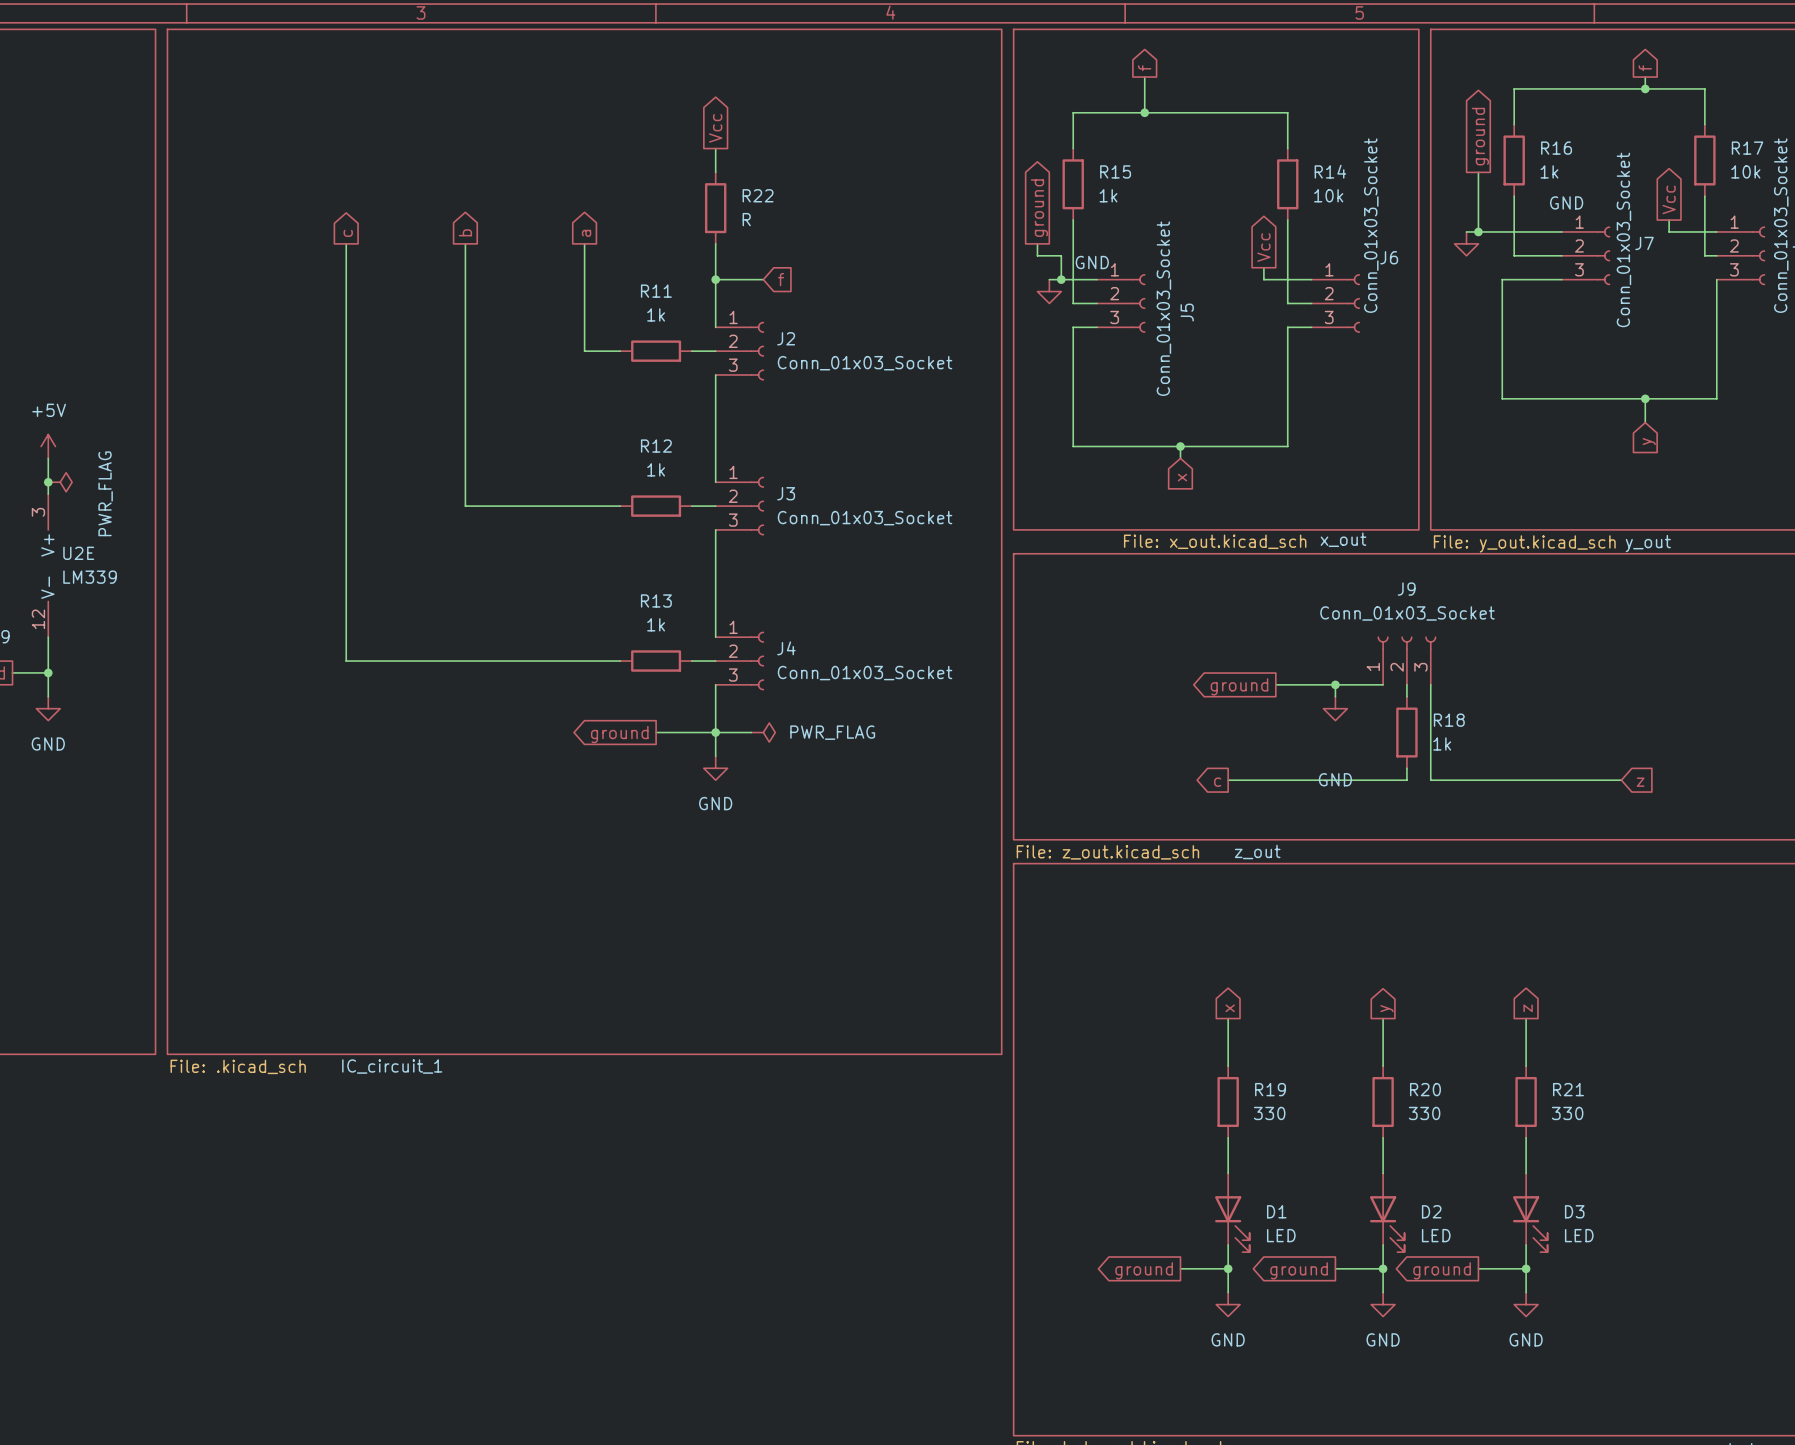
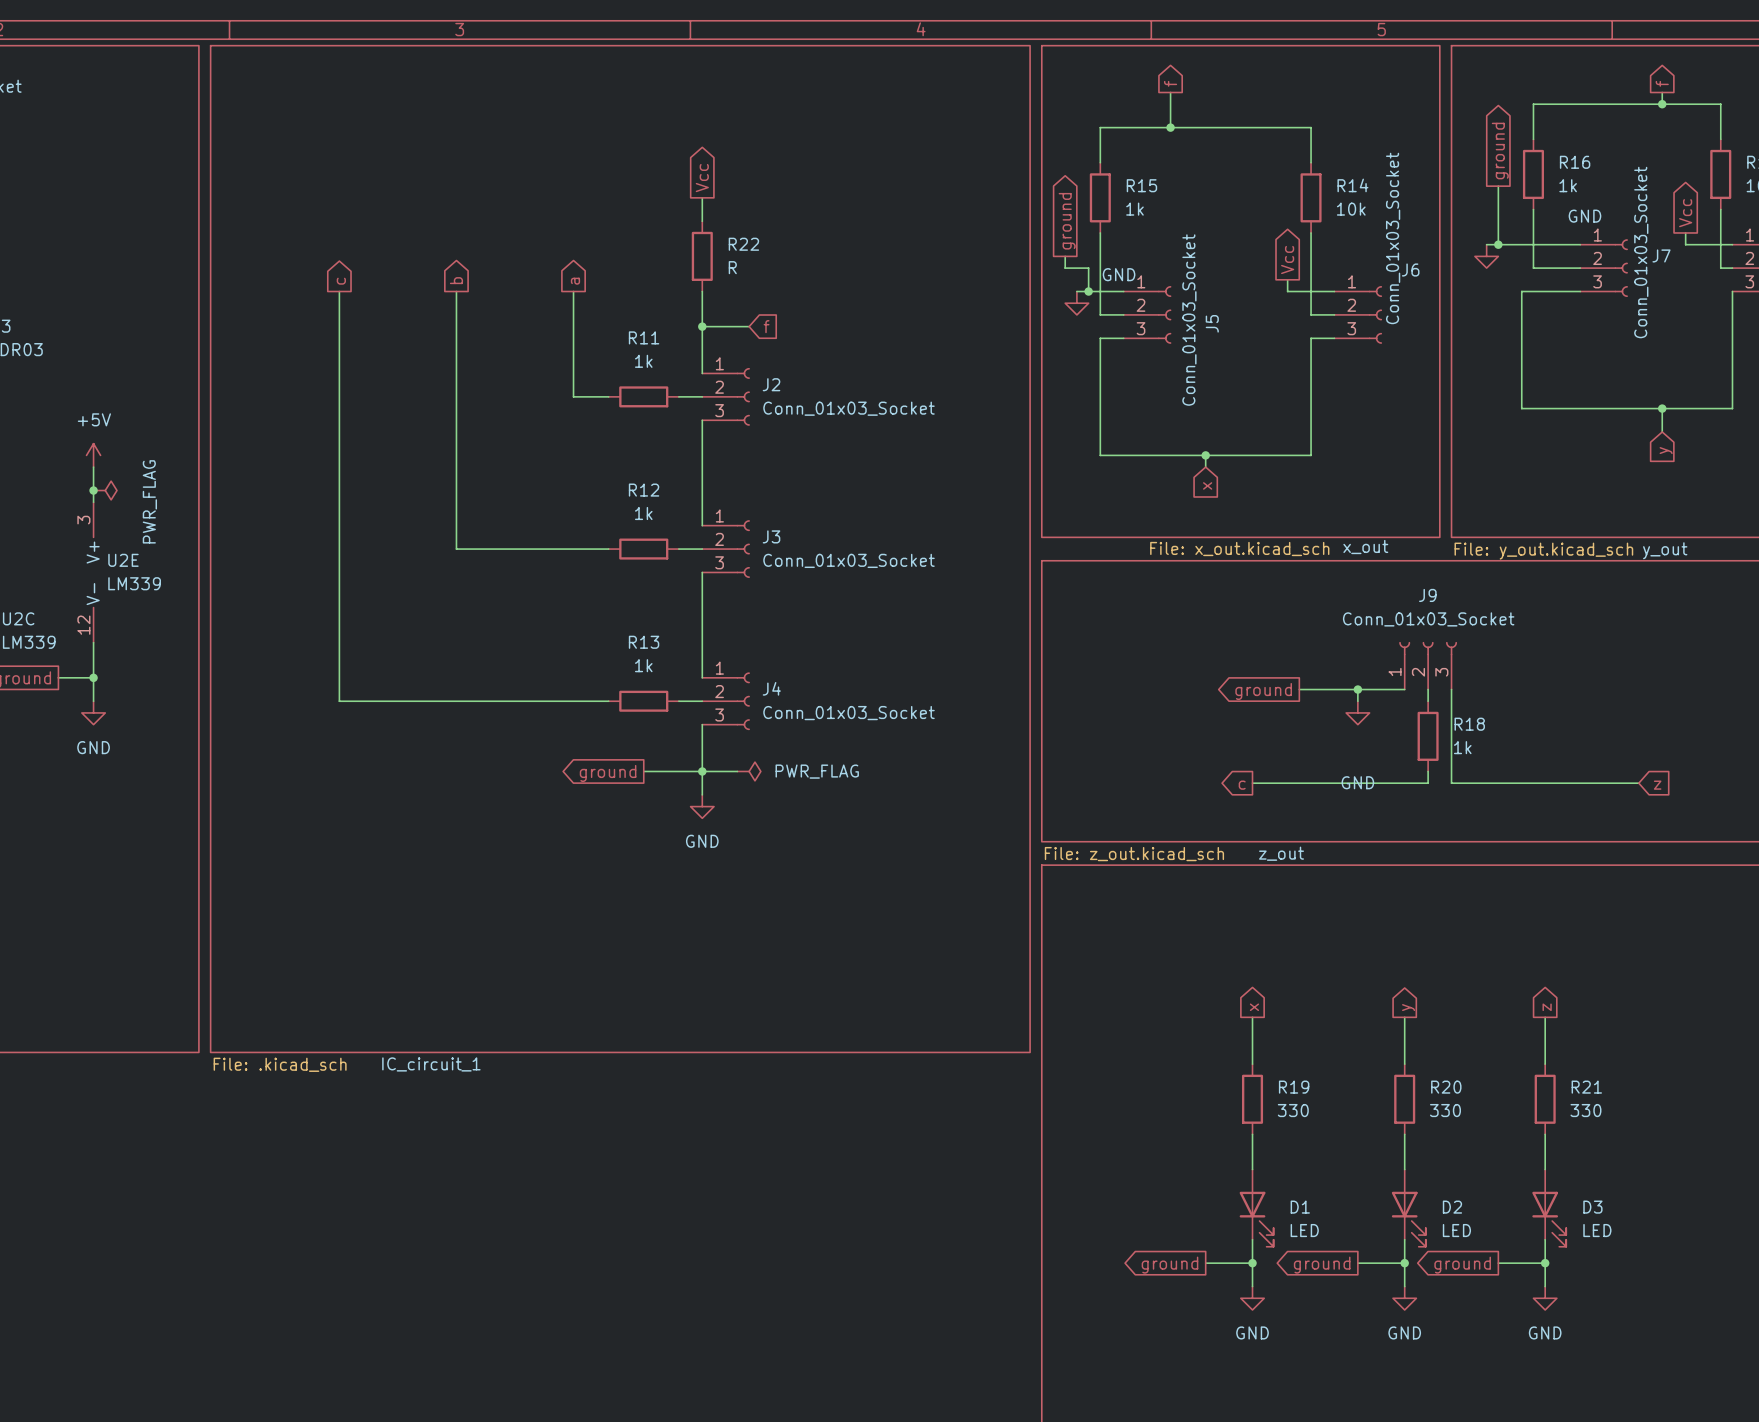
global label position: Vcc (715, 128) -> Vcc (702, 178)
wire: (715, 148) (715, 172) -> (702, 197) (702, 221)
R22 position: (715, 208) -> (702, 256)
global label position: b (465, 232) -> b (456, 280)
global label position: c (348, 233) -> c (341, 281)
global label position: a (586, 233) -> a (575, 281)
wire: (346, 243) (346, 661) (620, 661) -> (339, 291) (339, 701) (608, 701)
wire: (465, 243) (465, 506) (620, 506) -> (456, 291) (456, 549) (608, 549)
wire: (584, 243) (584, 351) (620, 351) -> (573, 291) (573, 396) (608, 396)
wire: (715, 243) (715, 327) -> (702, 291) (702, 373)
wire: (715, 279) (763, 279) -> (702, 326) (749, 326)
junction: (715, 279) -> none
global label position: f (781, 279) -> f (766, 326)
junction: none -> (702, 326)
R11 position: (656, 351) -> (643, 396)
wire: (691, 351) (715, 351) -> (678, 396) (702, 396)
J2 position: (739, 351) -> (726, 396)
wire: (715, 374) (715, 482) -> (702, 420) (702, 525)
R12 position: (656, 506) -> (643, 549)
wire: (691, 506) (715, 506) -> (678, 549) (702, 549)
J3 position: (739, 506) -> (726, 549)
wire: (715, 529) (715, 637) -> (702, 572) (702, 677)
R13 position: (656, 661) -> (643, 701)
wire: (691, 661) (715, 661) -> (678, 701) (702, 701)
J4 position: (739, 661) -> (726, 701)
wire: (715, 684) (715, 756) -> (702, 724) (702, 794)
wire: (656, 732) (751, 732) -> (643, 771) (737, 771)
junction: (715, 732) -> none
power symbol: PWR_FLAG (763, 732) -> none
global label position: ground (619, 734) -> ground (608, 773)
junction: none -> (702, 771)
power symbol: GND (715, 768) -> PWR_FLAG (749, 771)
power symbol: none -> GND (702, 806)

